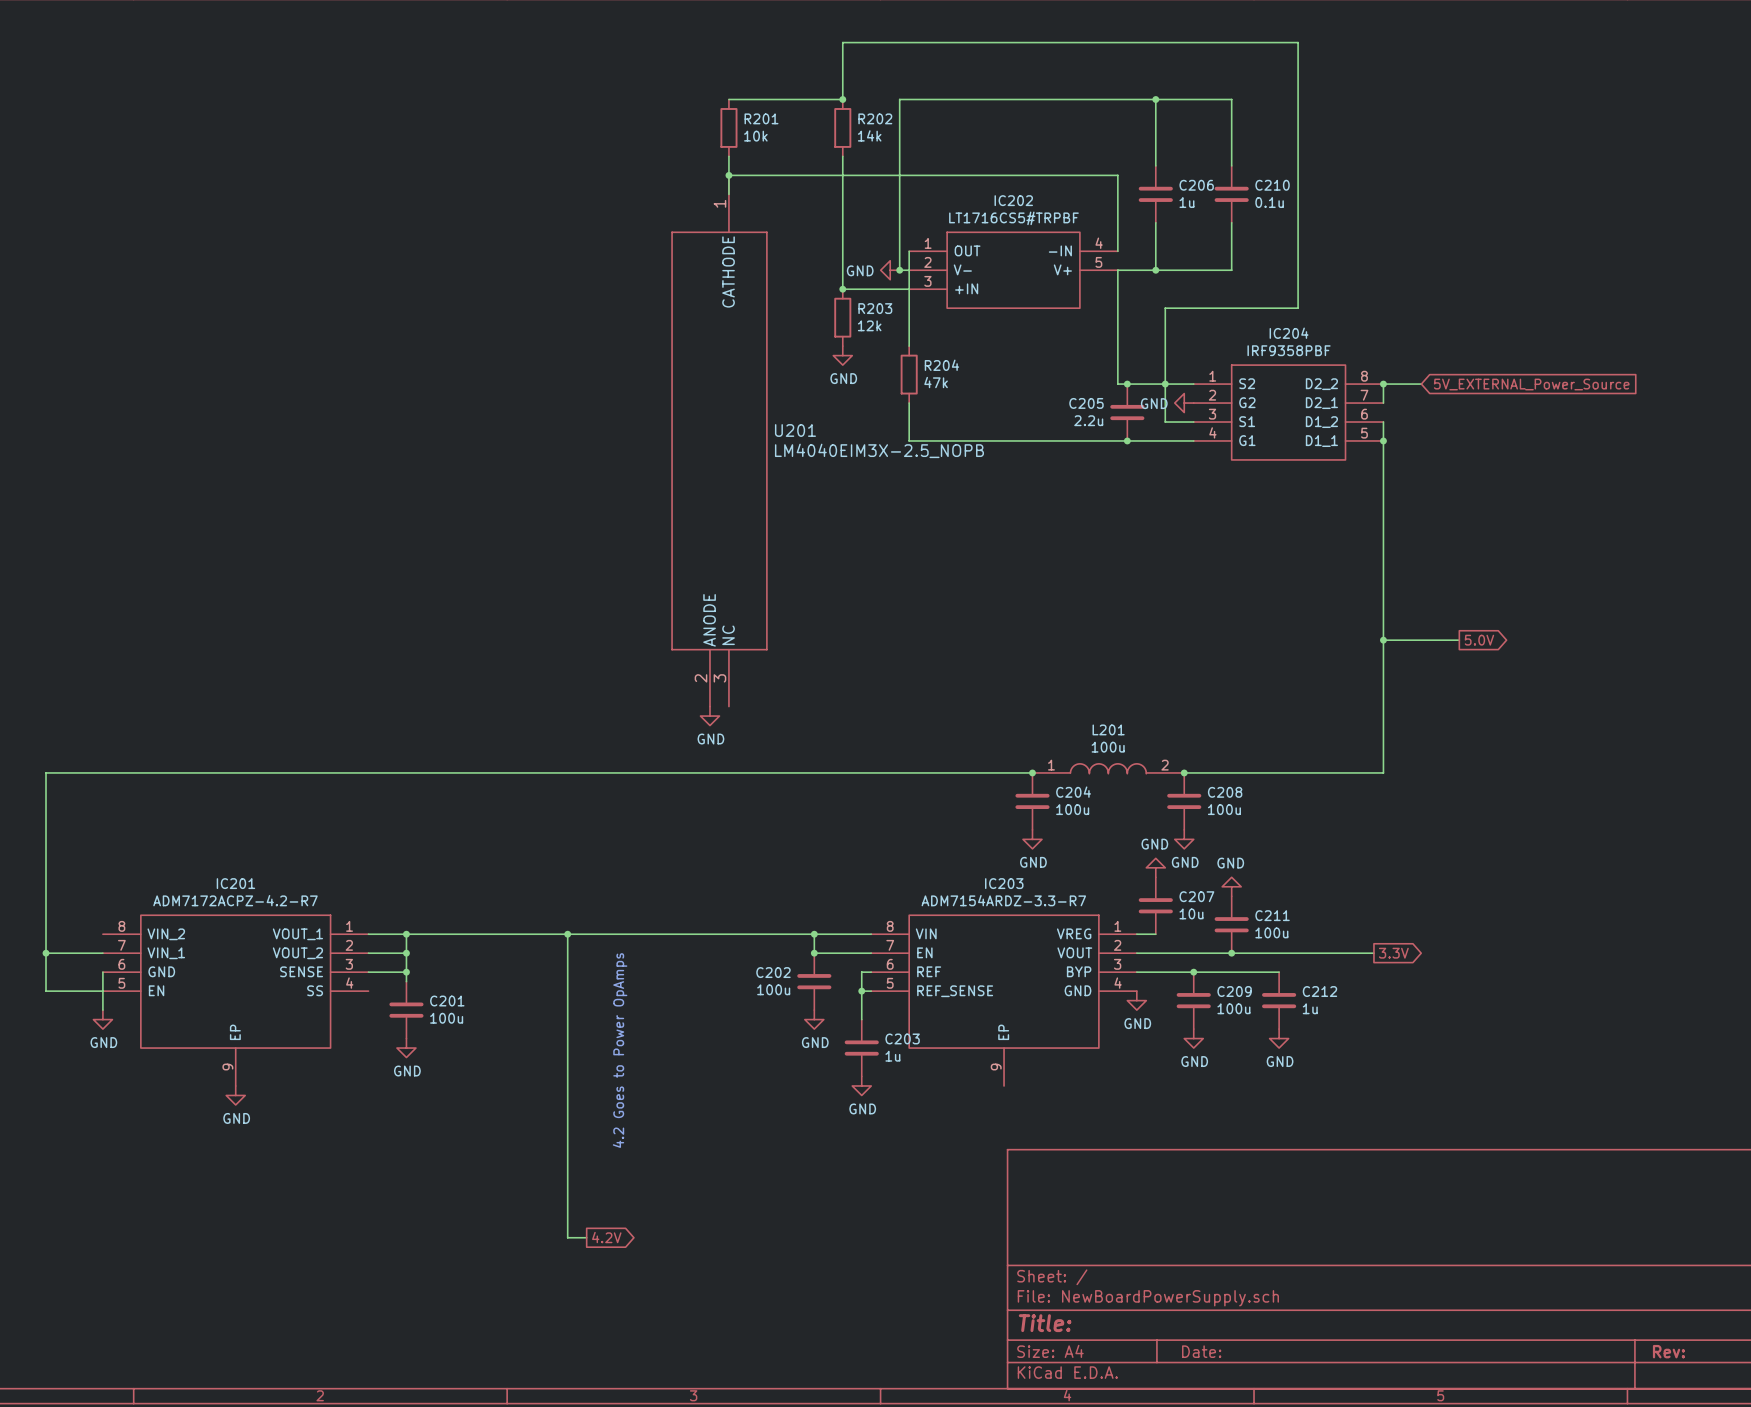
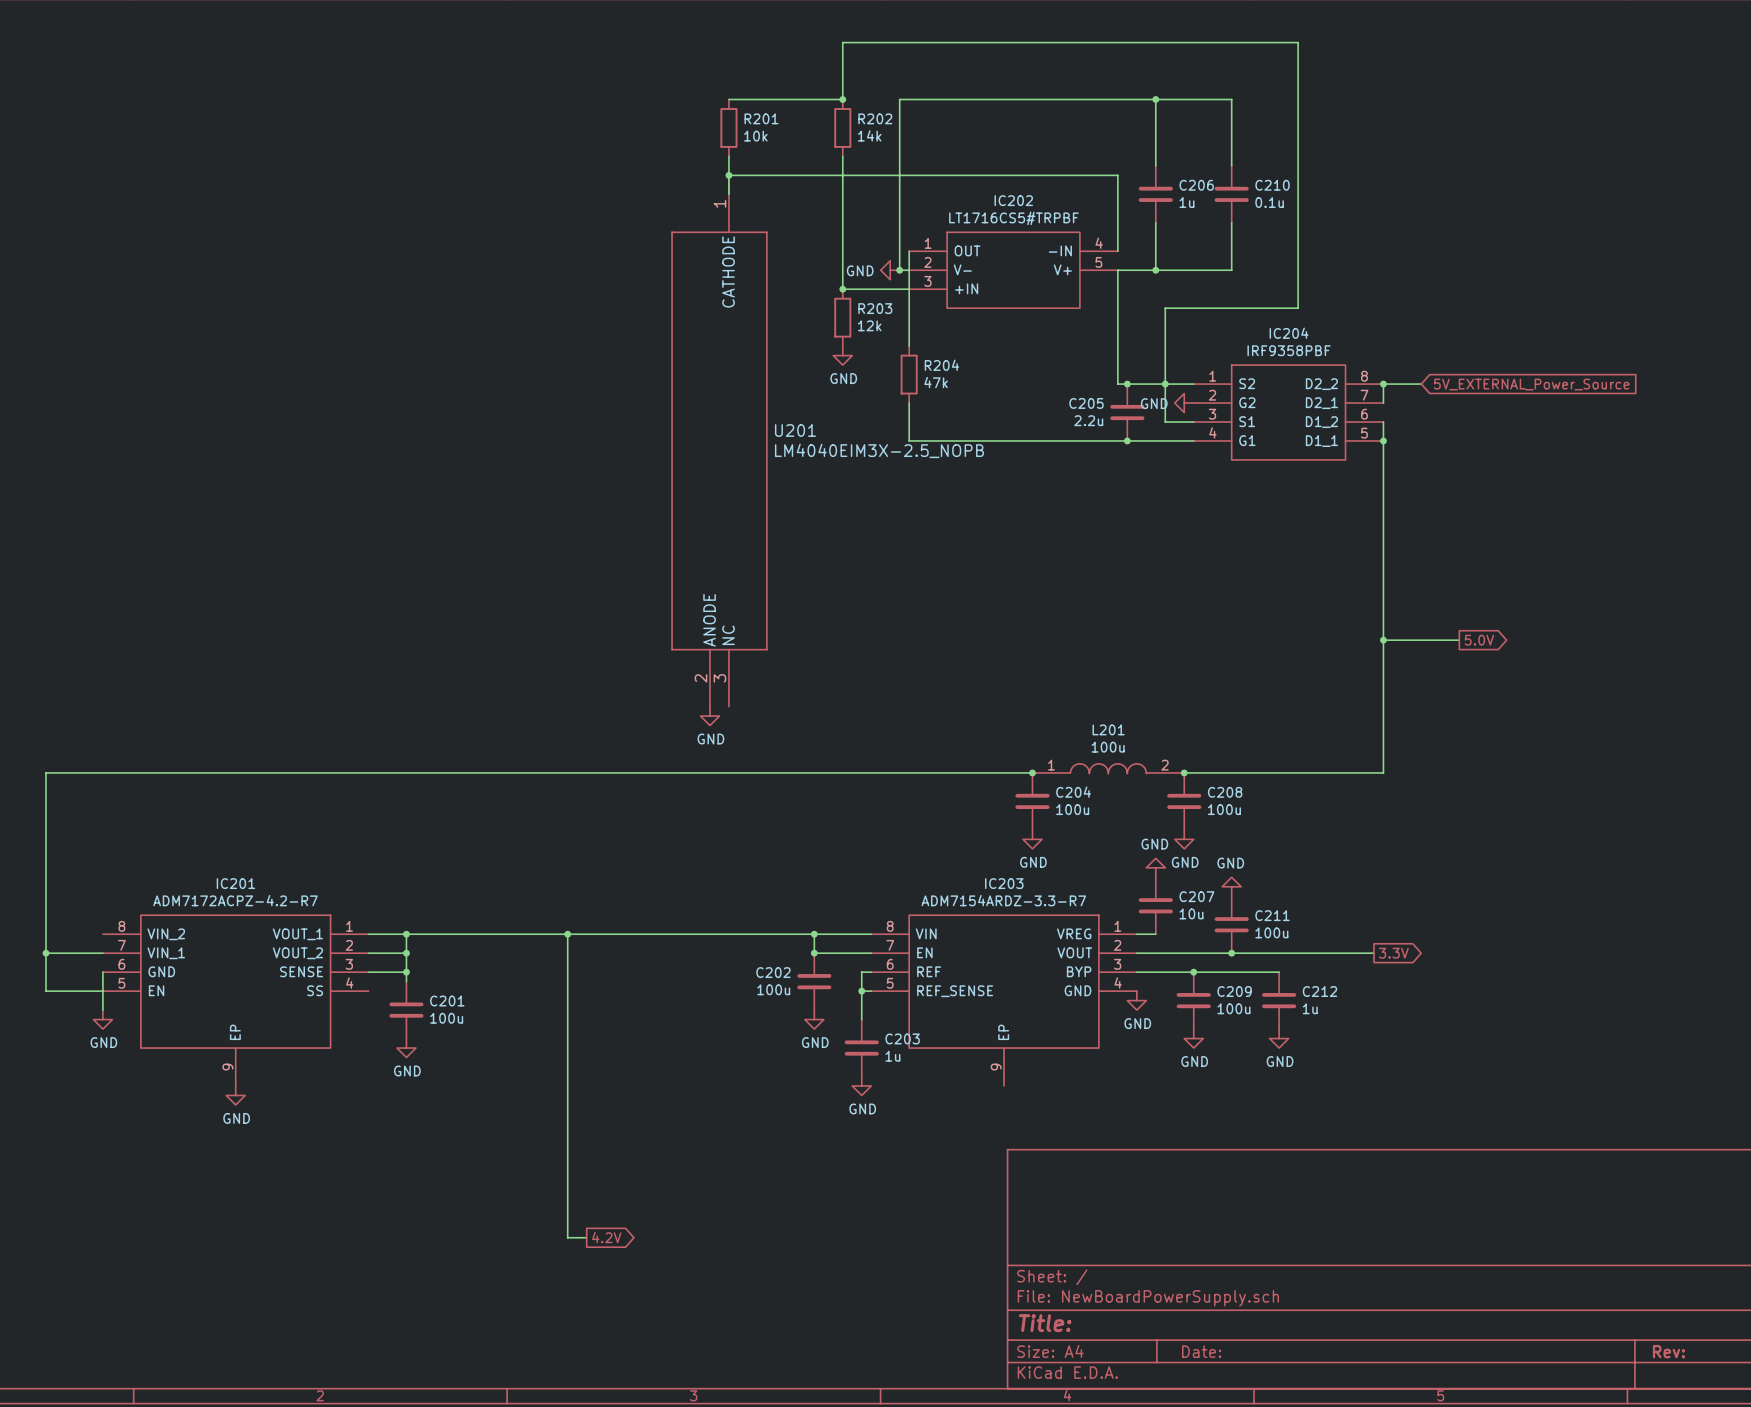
text: 4.2 Goes to Power OpAmps (620, 1050) -> none

